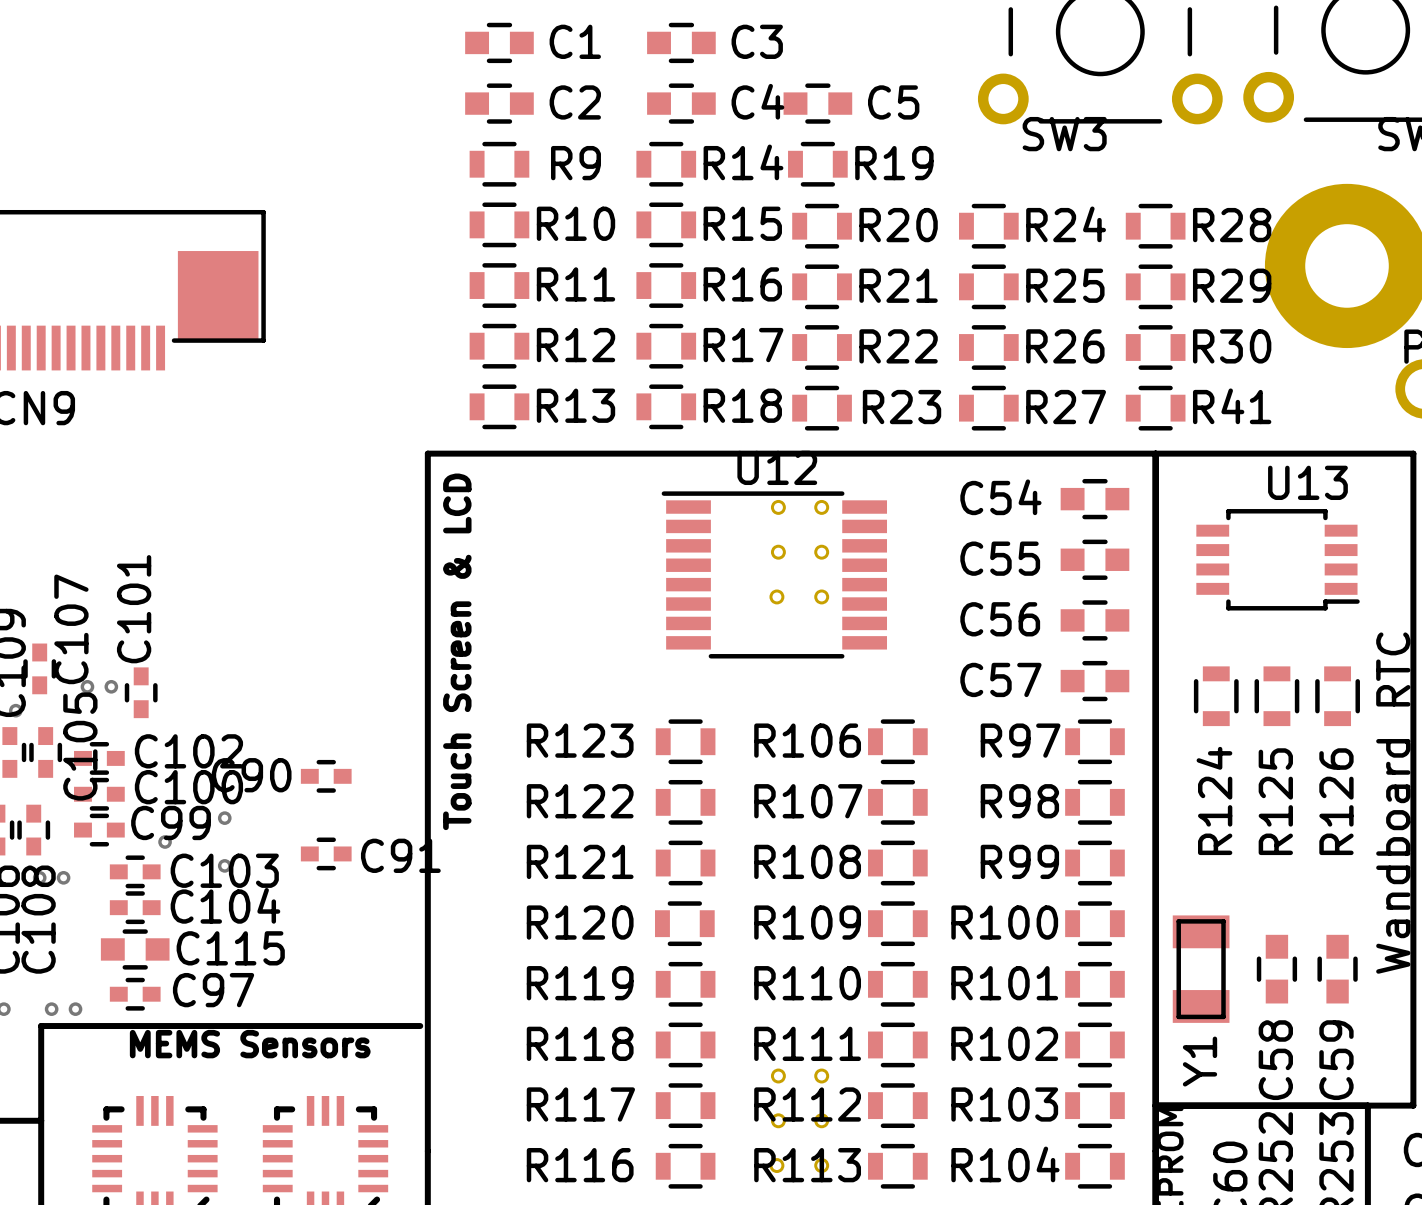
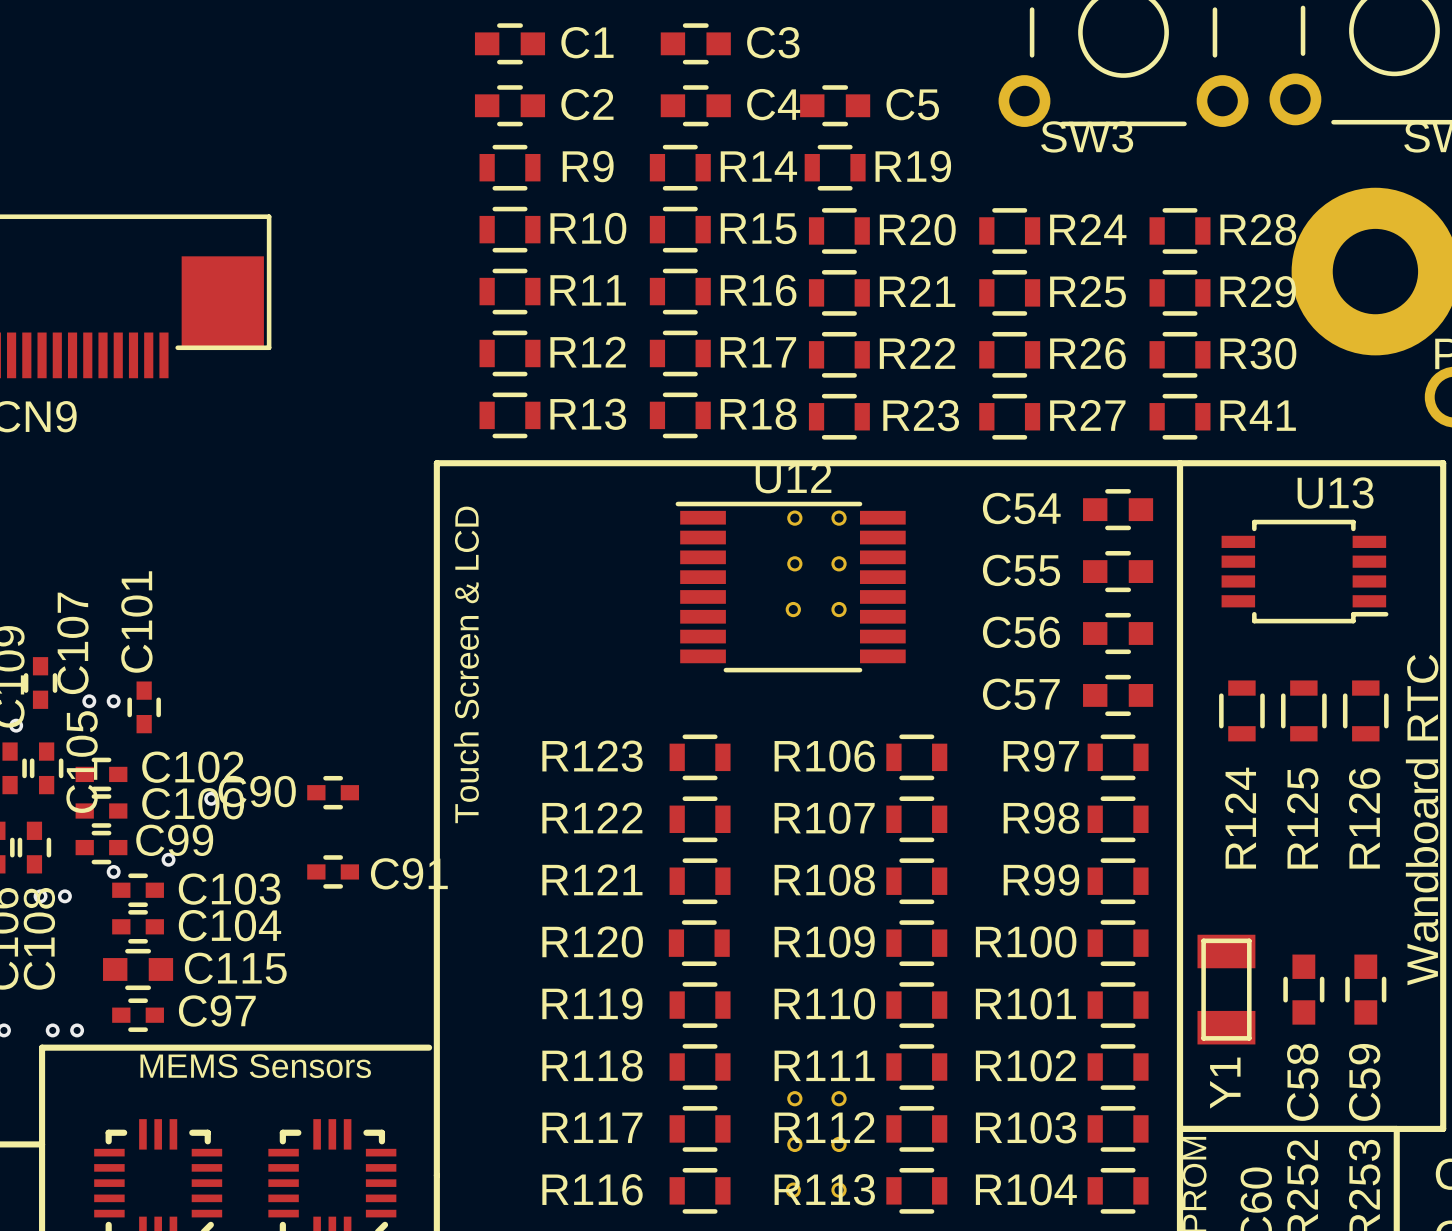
via position: (224, 818) -> (211, 798)
via: none -> (113, 871)
via: (224, 865) -> none

